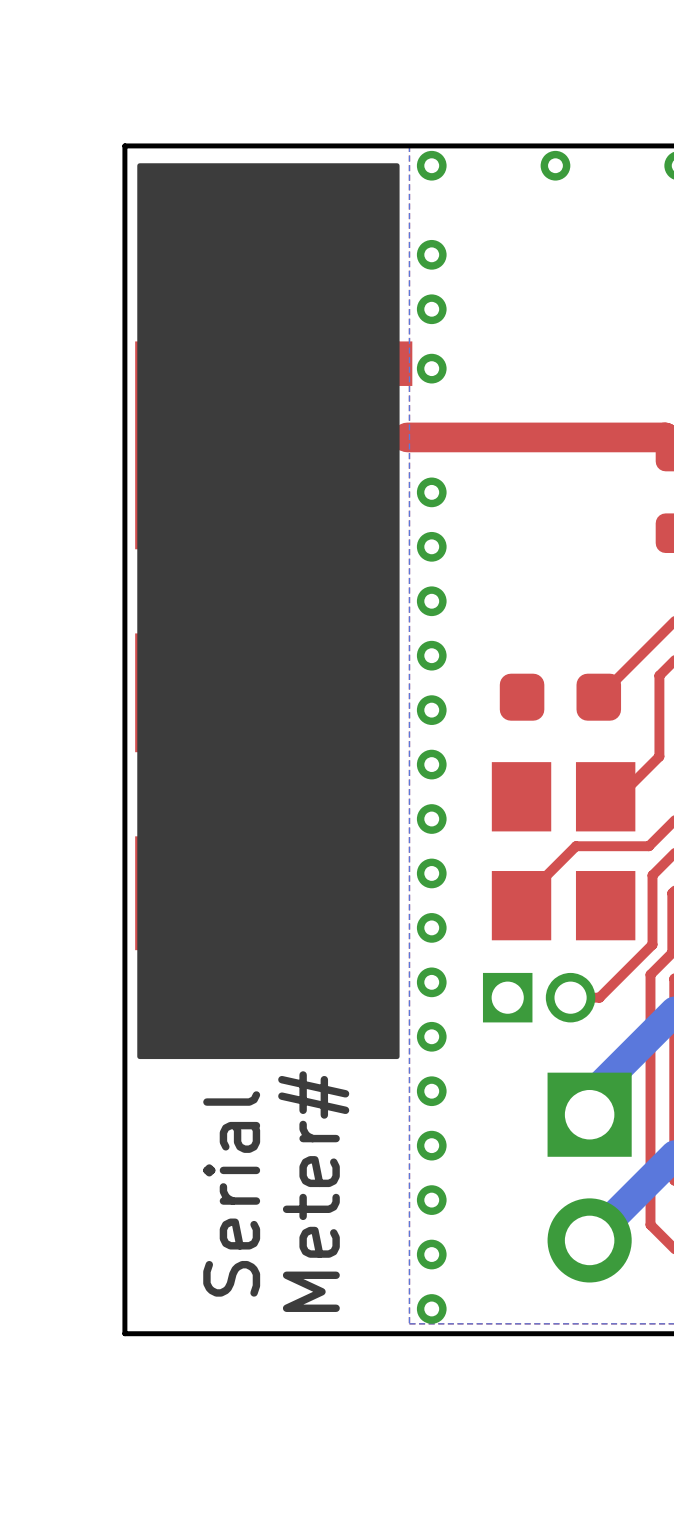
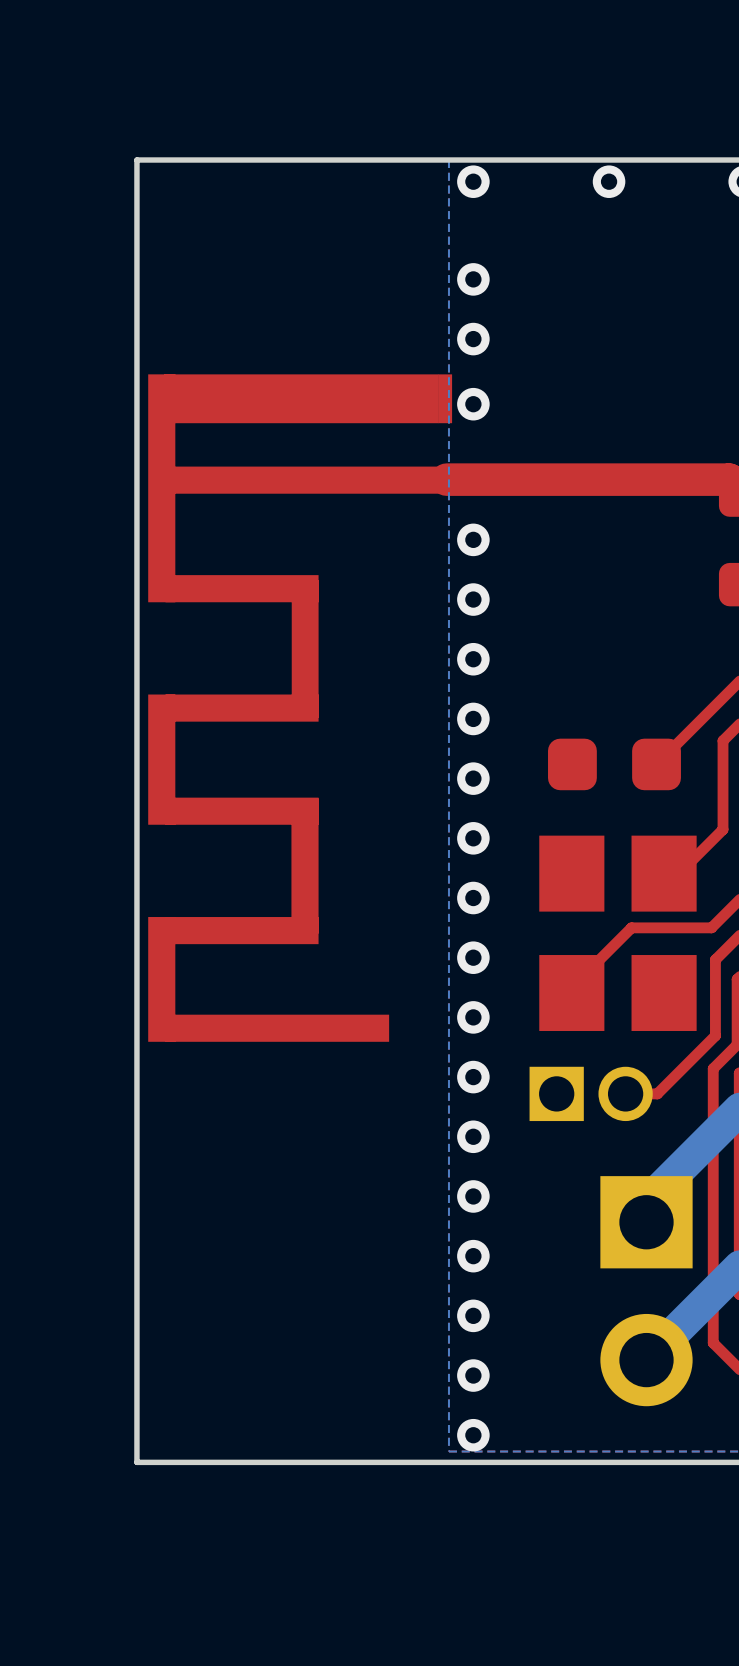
drawing: [137, 163, 400, 1060] -> none
text: Meter# (313, 1191) -> none
text: Serial (231, 1193) -> none

